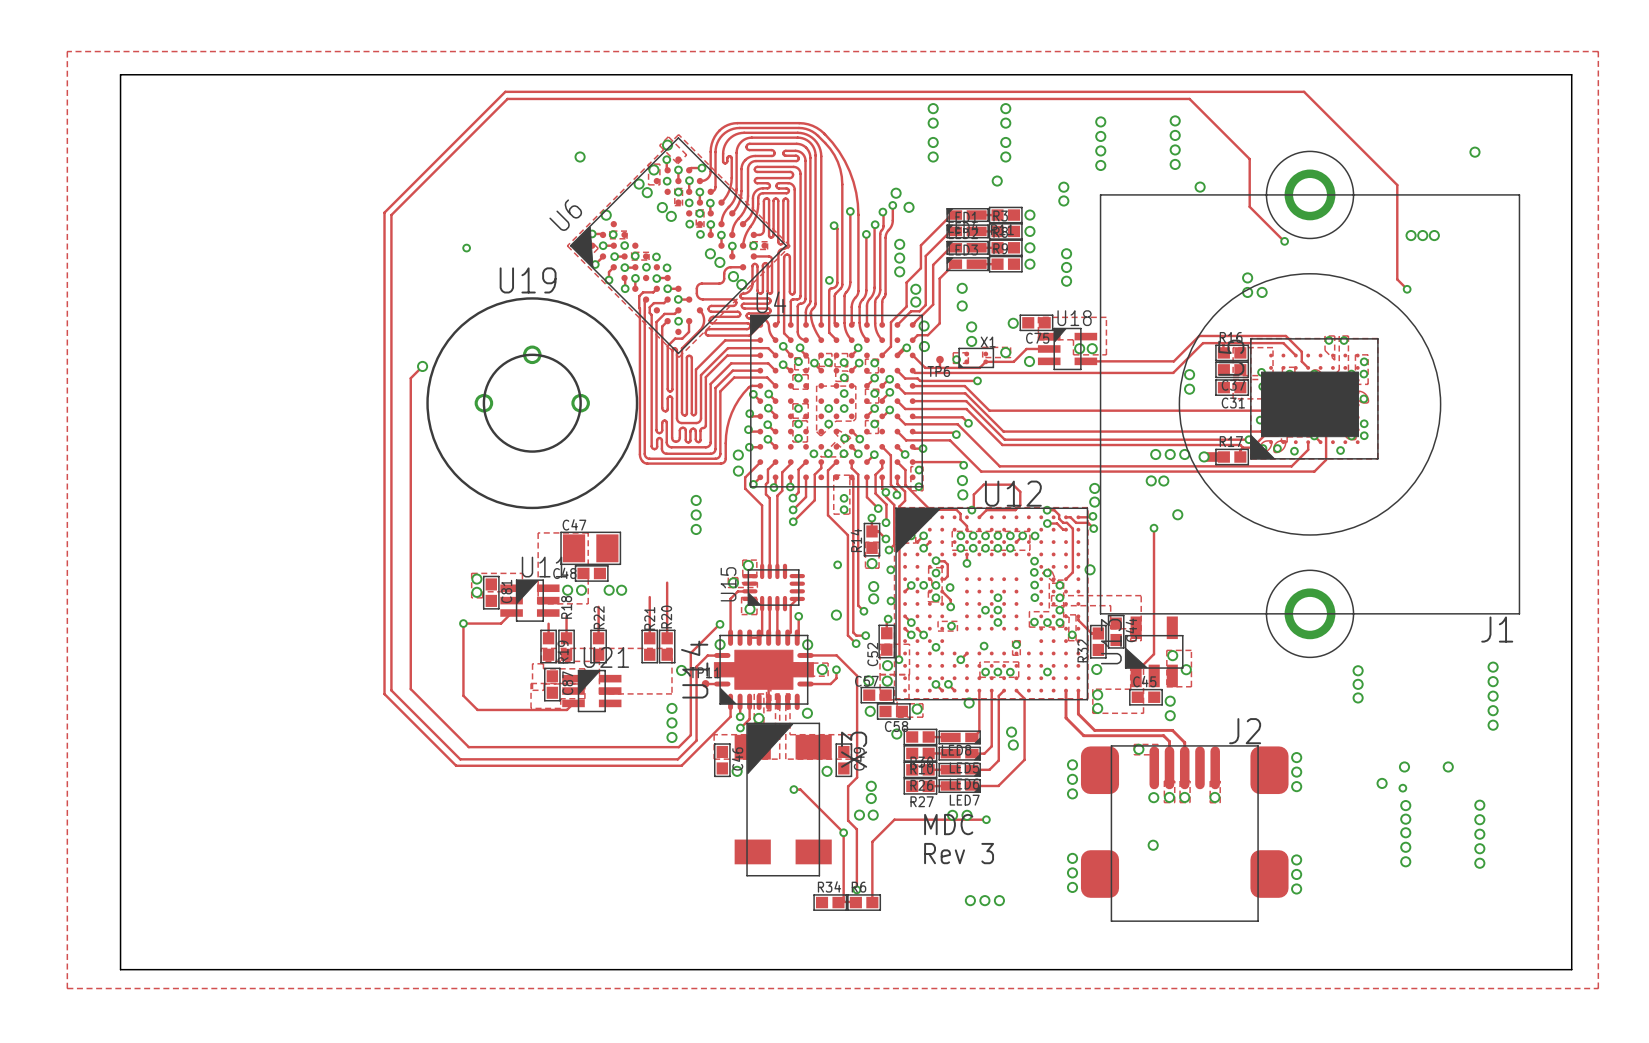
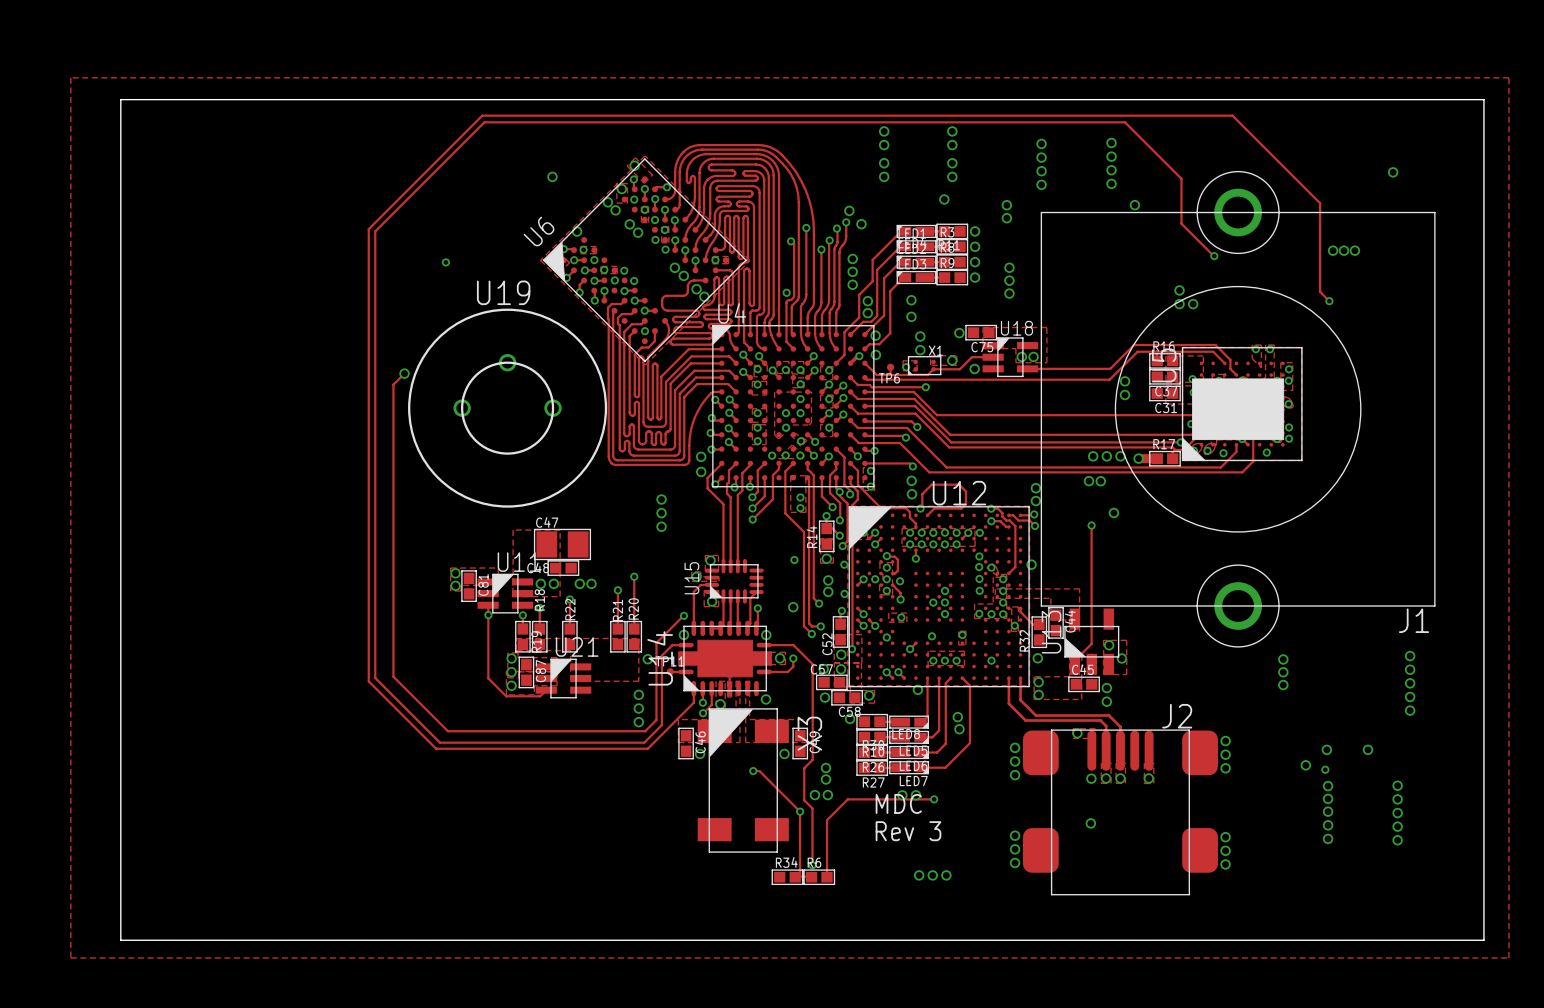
via: none -> (634, 576)
via: none -> (617, 590)
via: none -> (569, 599)
track: (511, 613) (501, 623) (463, 623) (463, 695) (477, 709) (530, 709) -> (488, 605) (488, 678) (506, 696)
via: none -> (539, 608)
via: (463, 623) -> none
via: none -> (488, 615)
via: none -> (522, 615)
via: none -> (511, 658)
via: none -> (511, 672)
via: none -> (511, 685)

